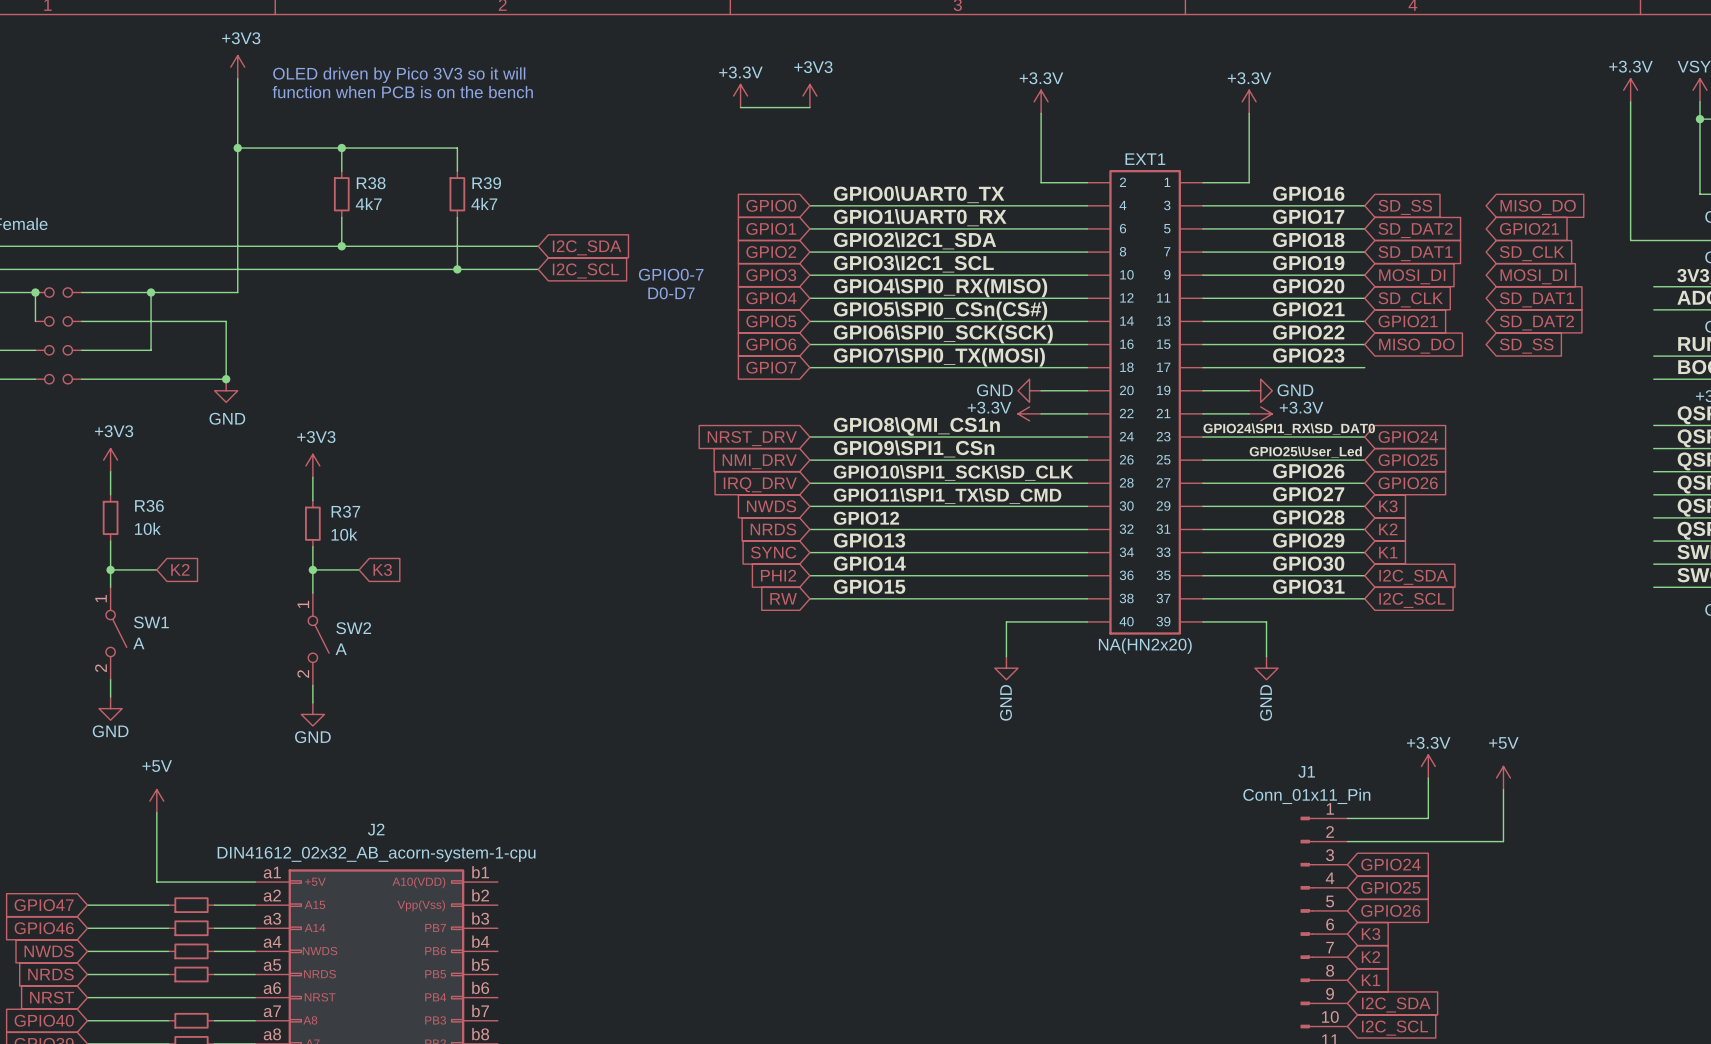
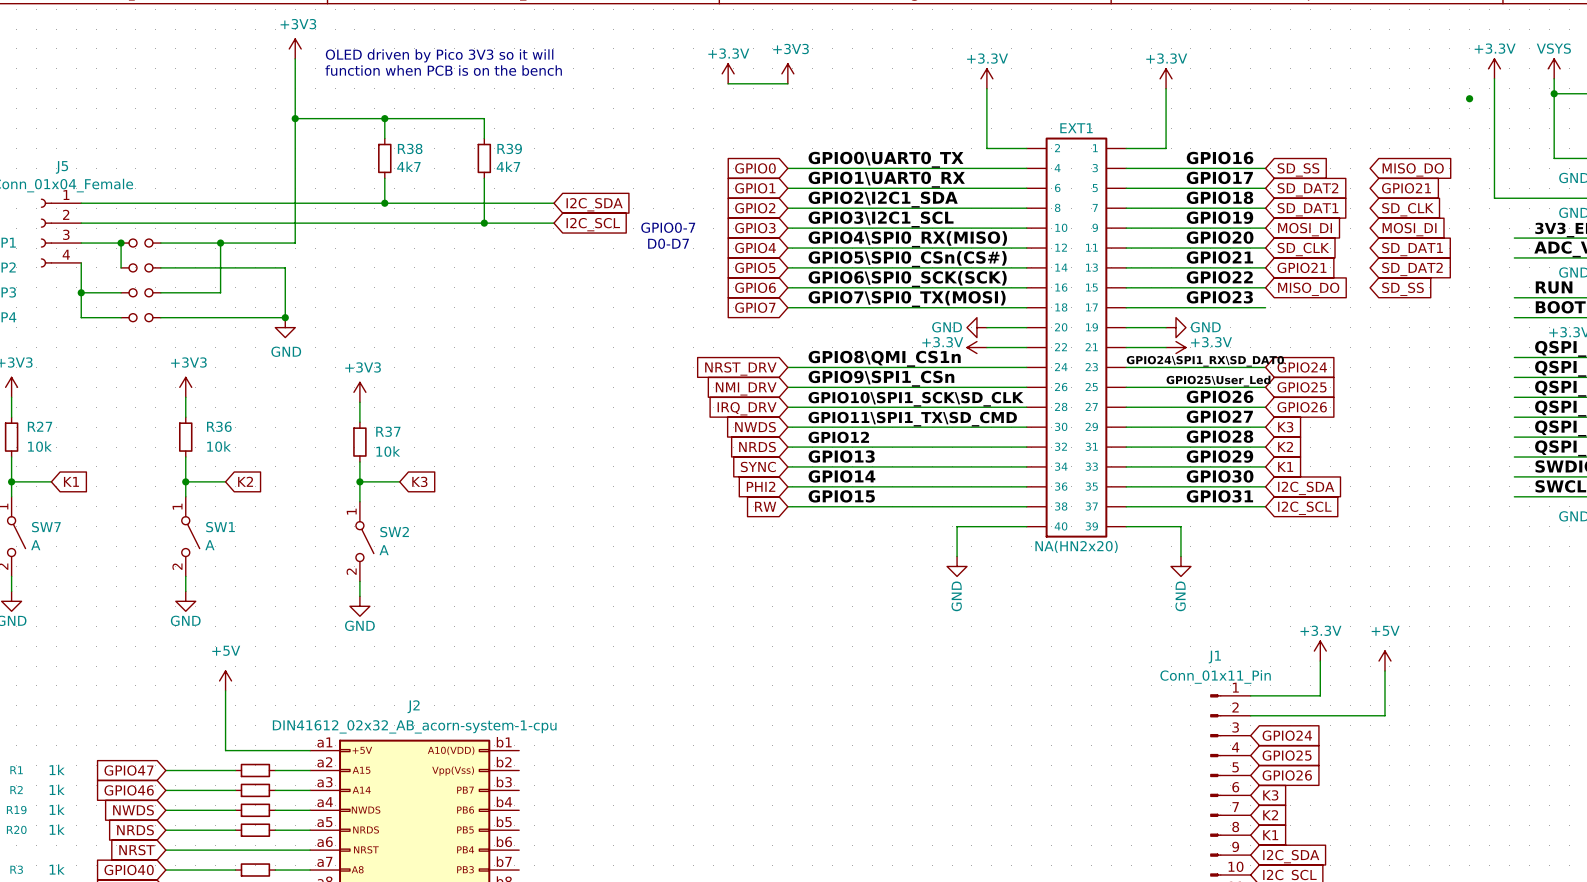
junction: none -> (1469, 98)

